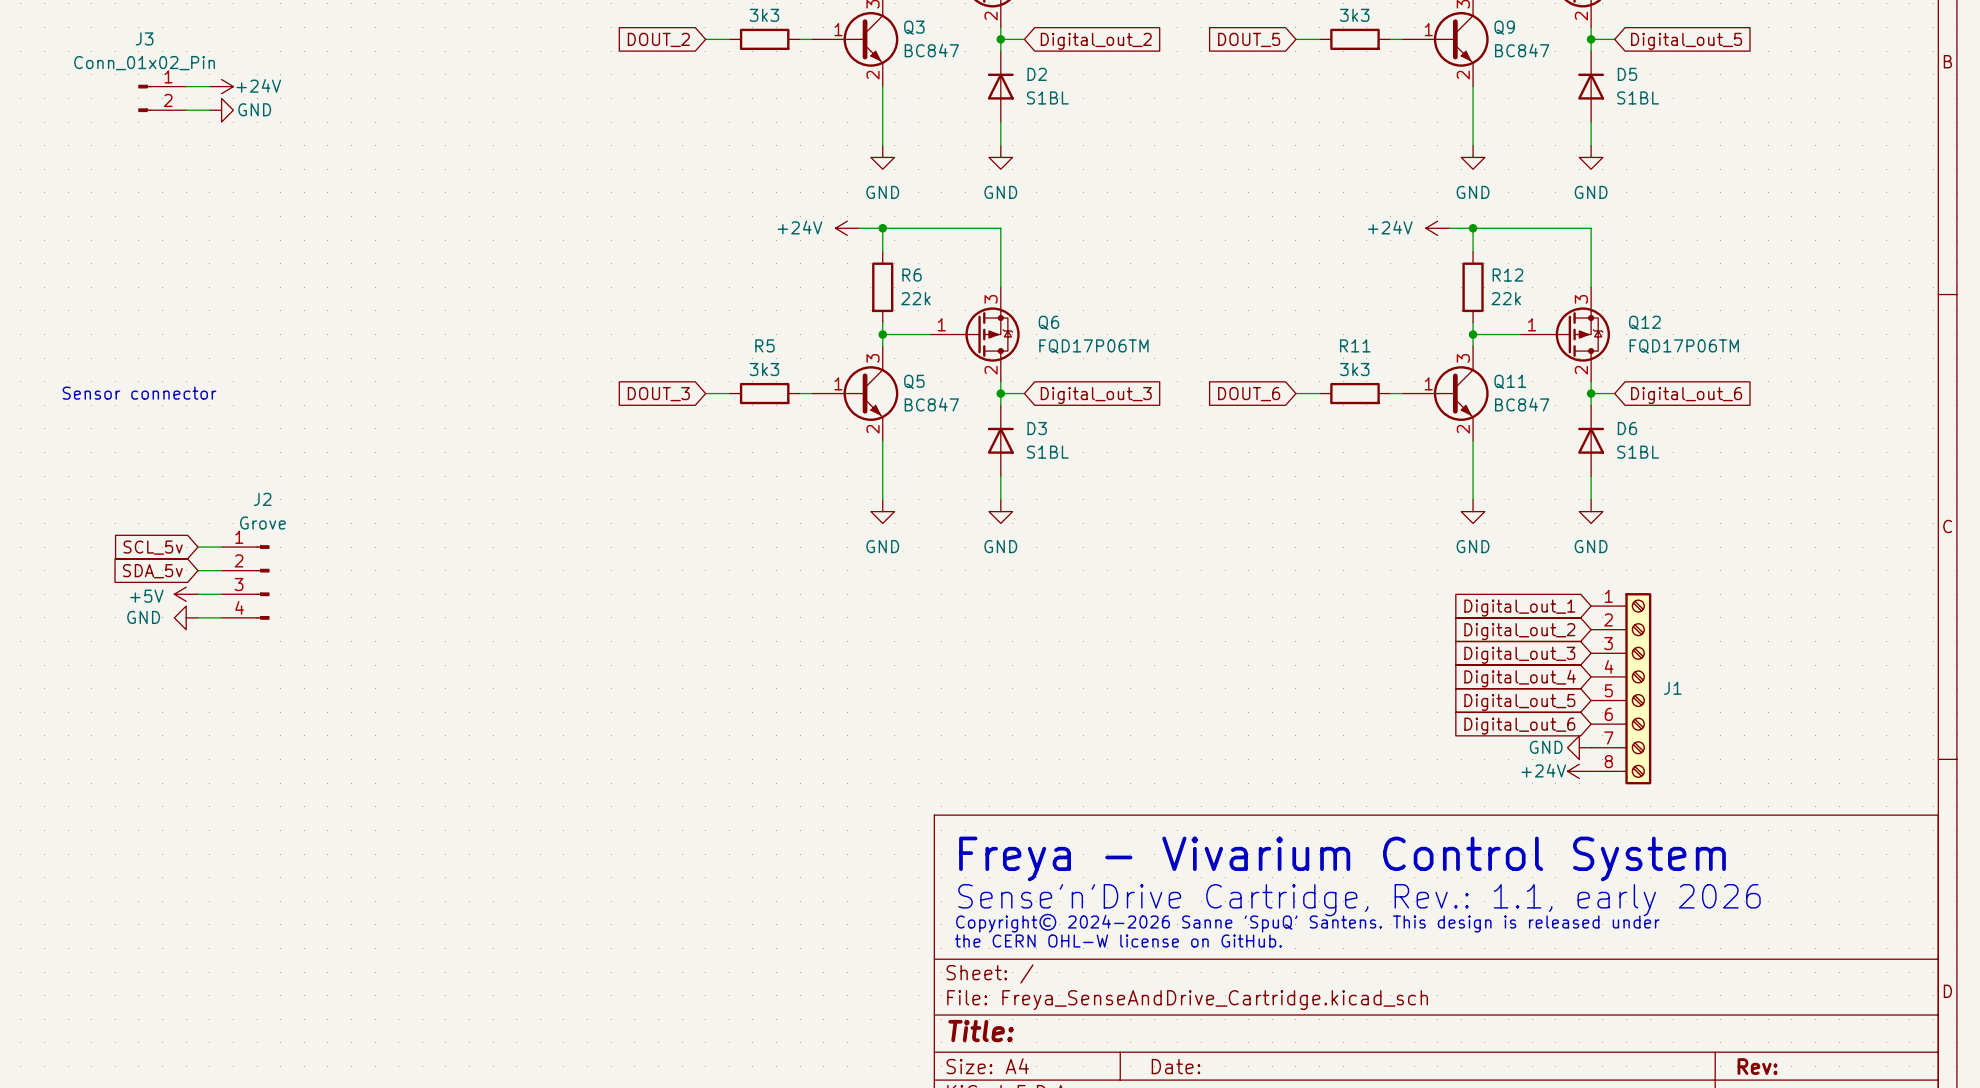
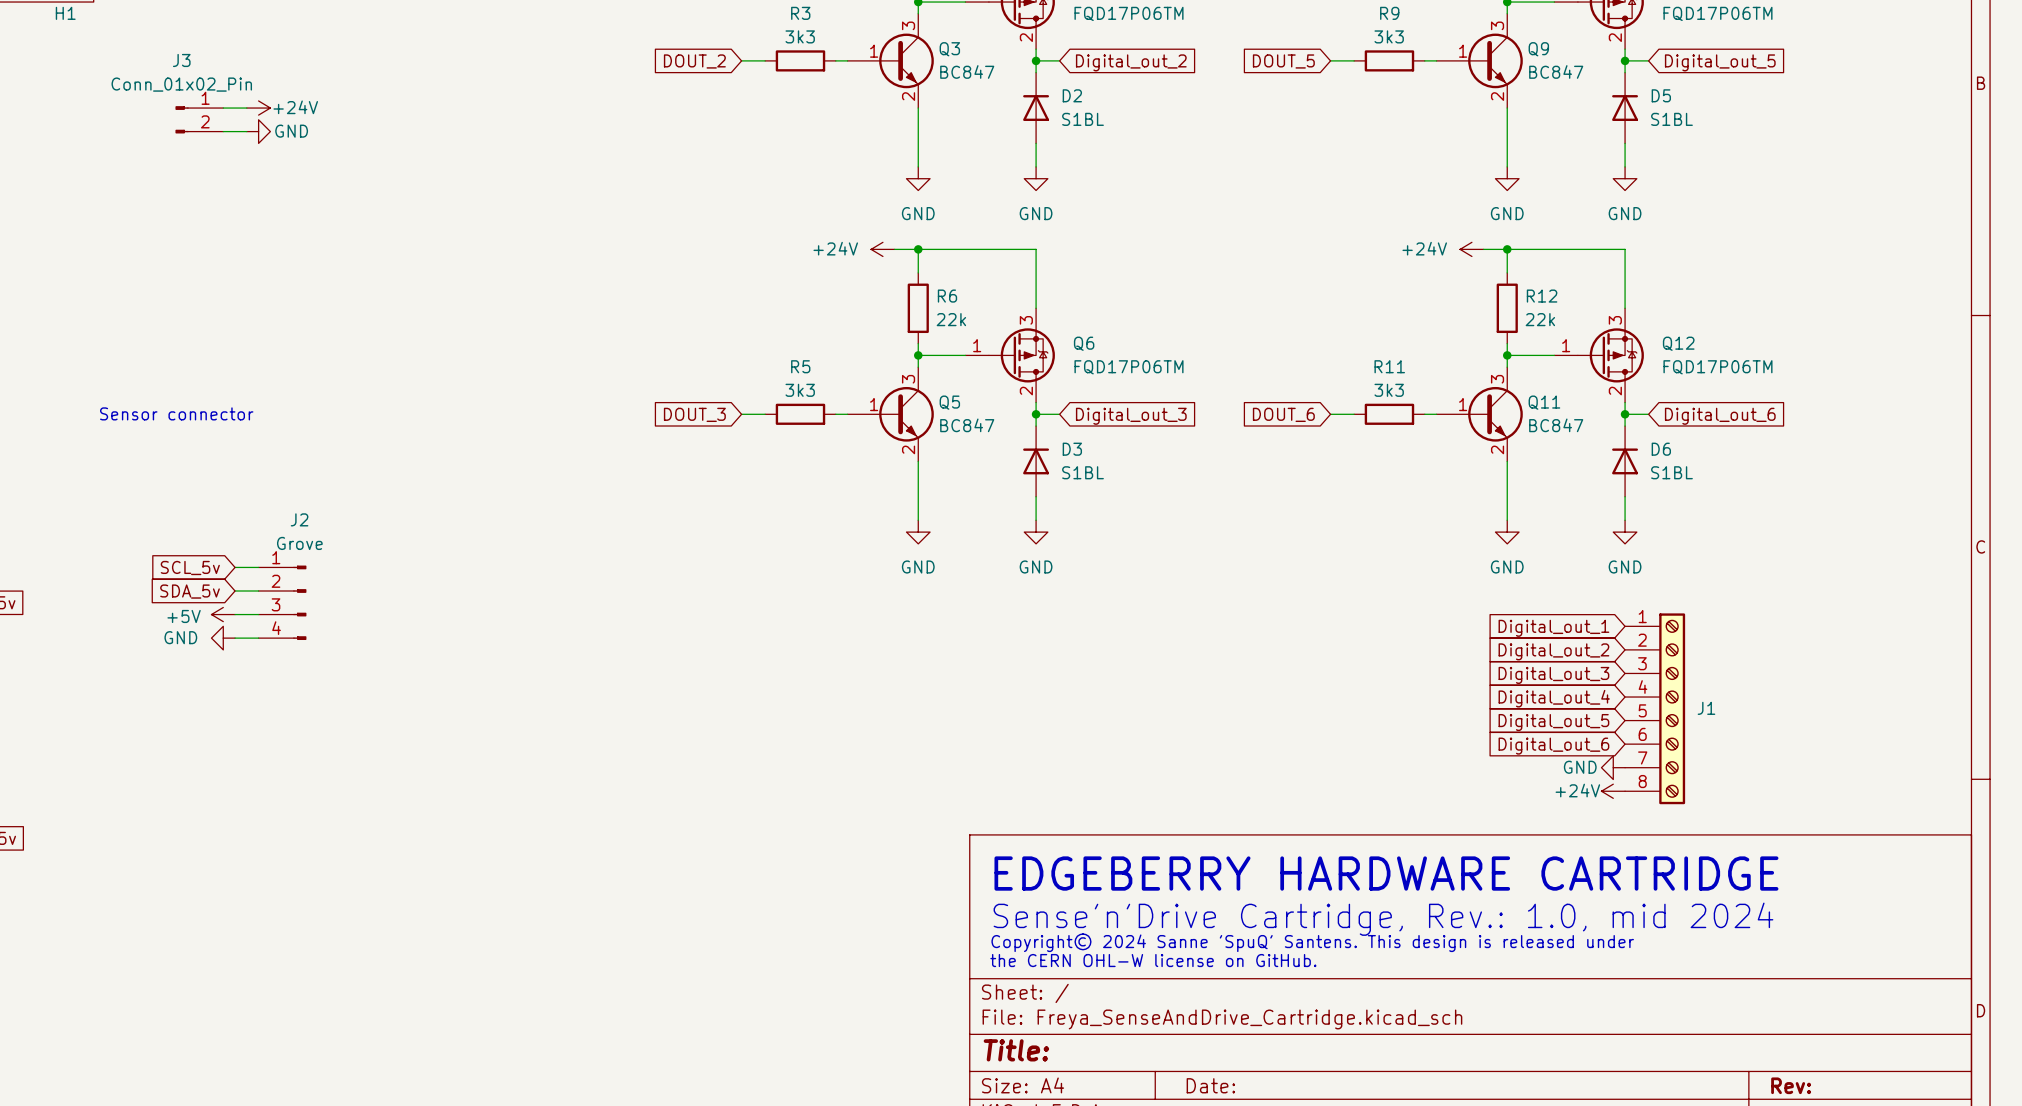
text: Freya - Vivarium Control System (1342, 858) -> EDGEBERRY HARDWARE CARTRIDGE (1386, 873)
text: Sense'n'Drive Cartridge, Rev.: 1.1, early 2026 (1359, 900) -> Sense'n'Drive Cartridge, Rev.: 1.0, mid 2024 (1383, 919)
text: Copyright© 2024-2026 Sanne 'SpuQ' Santens. This design is released under (1307, 923) -> Copyright© 2024 Sanne 'SpuQ' Santens. This design is released under (1312, 942)

